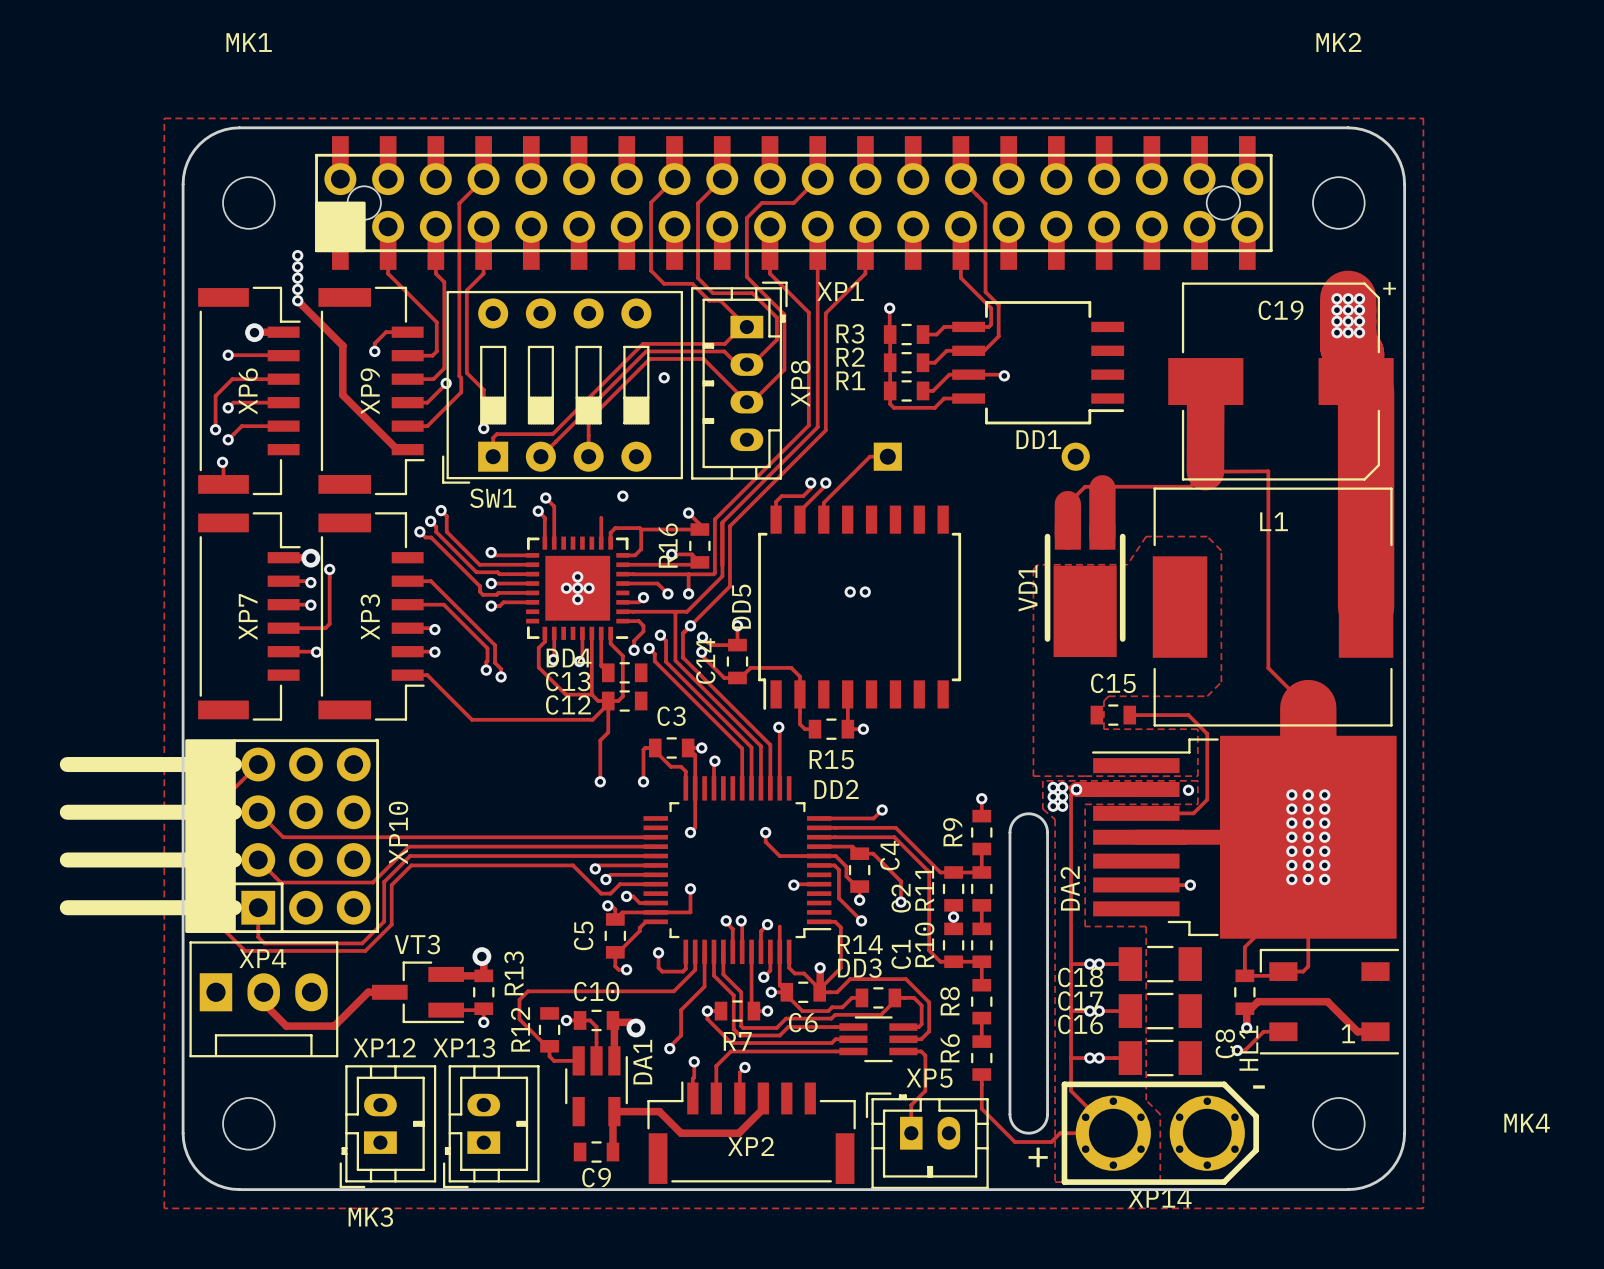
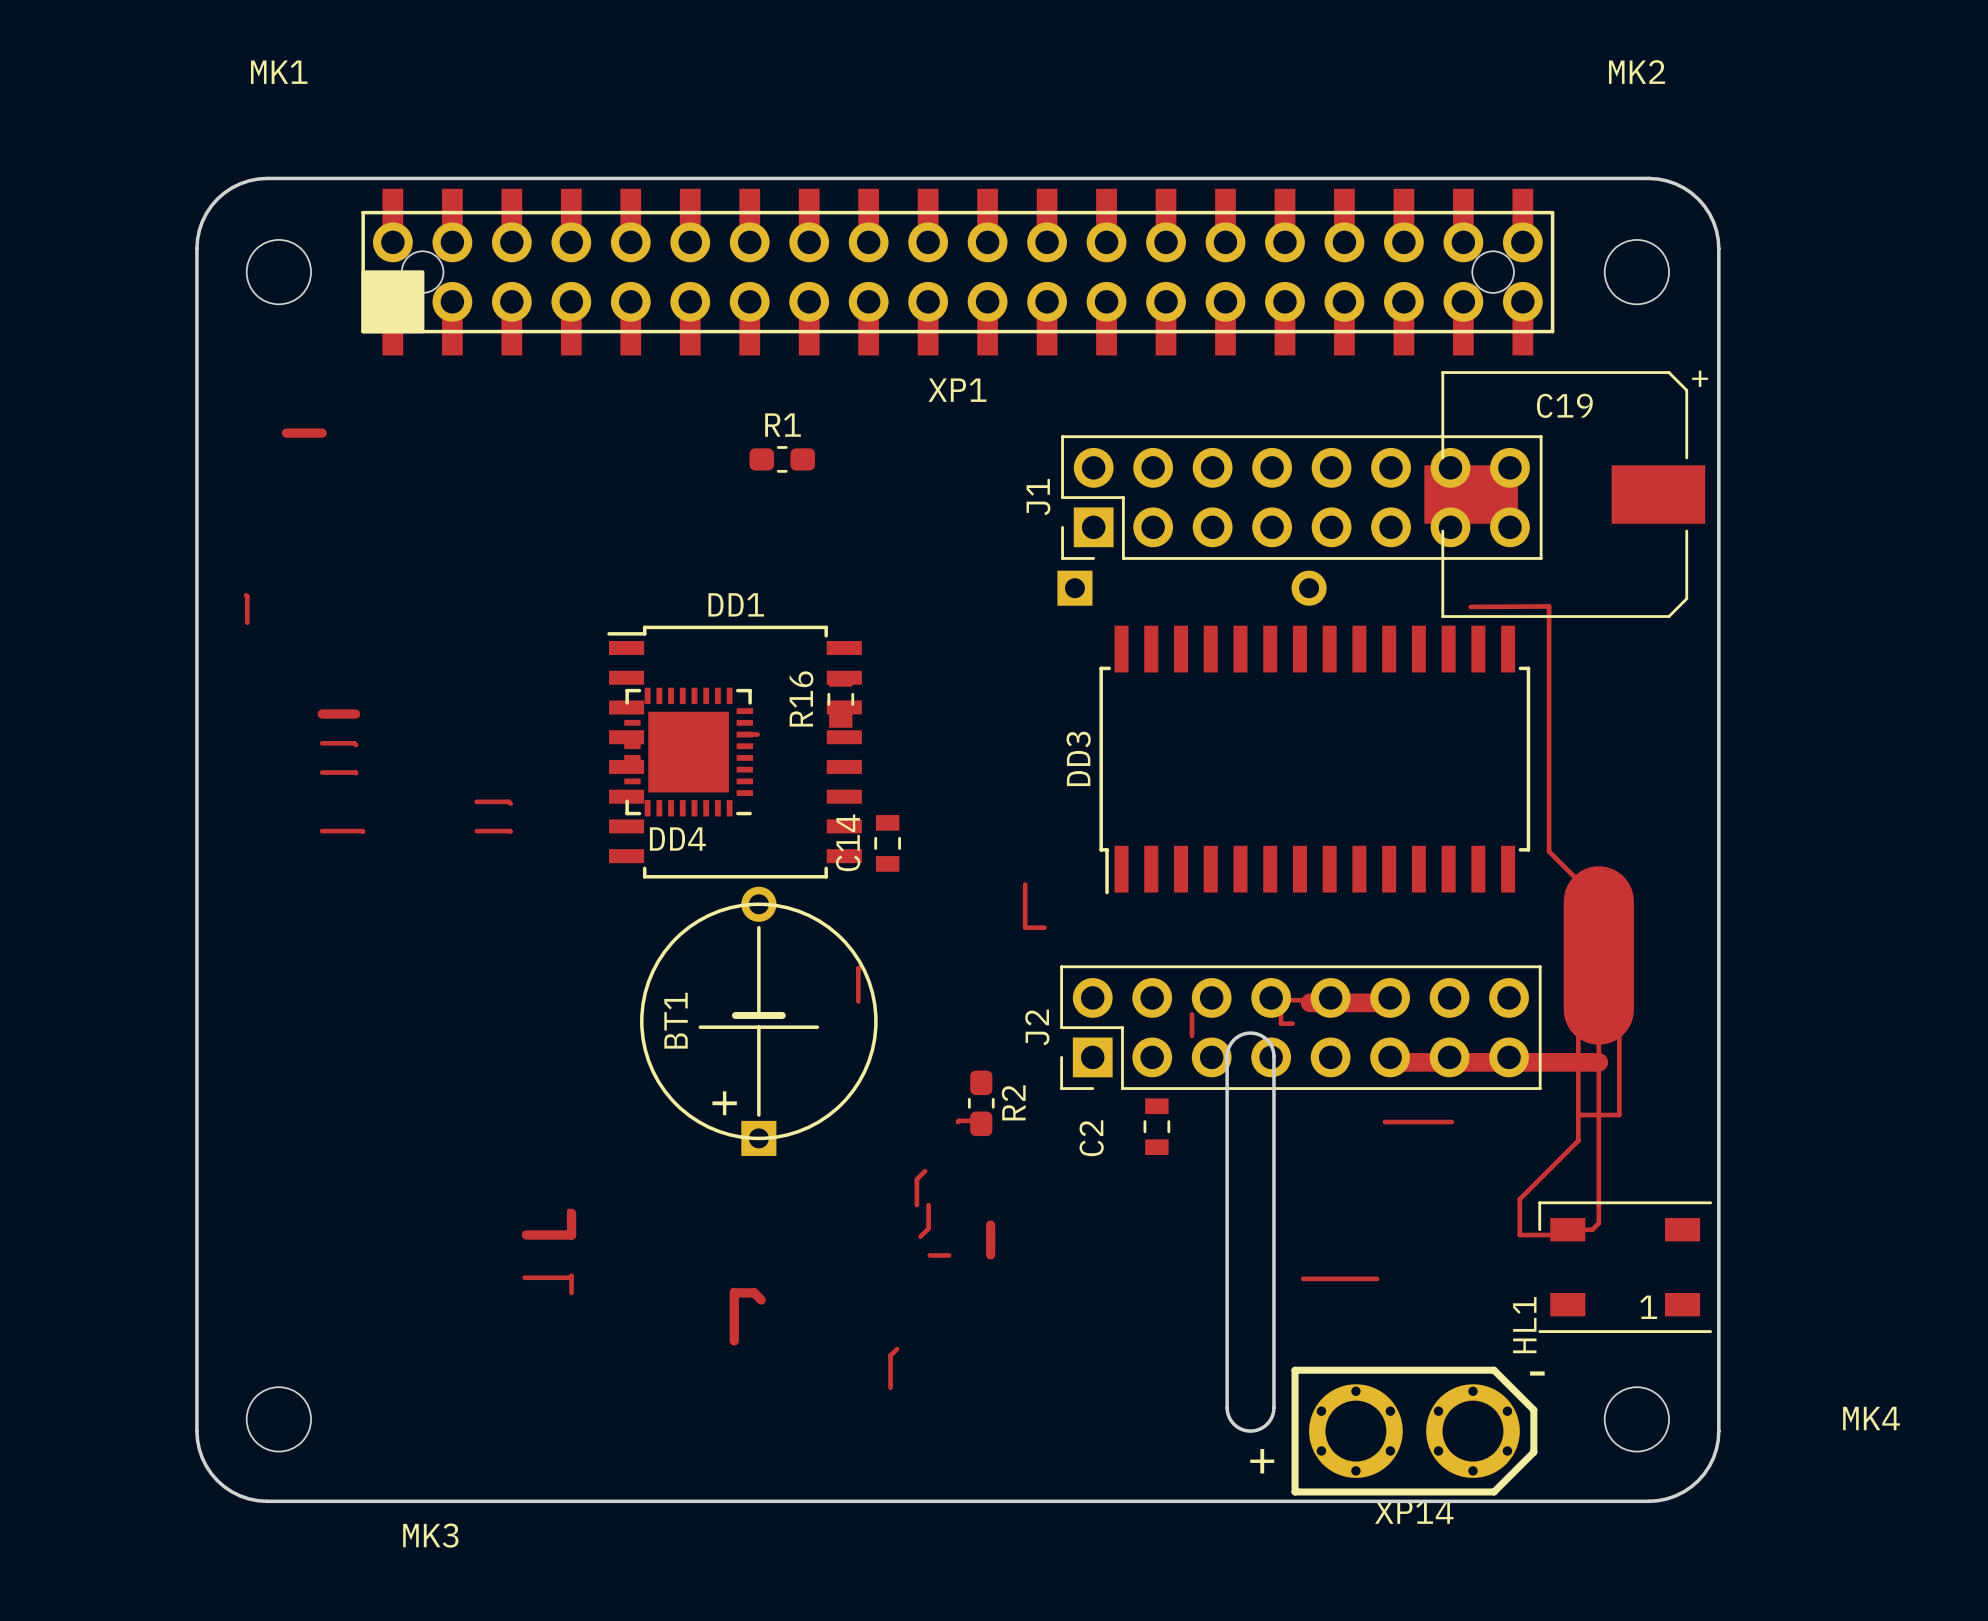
zone outline: (164, 118) (1423, 118) (1423, 1208) (164, 1208) (164, 118) -> none
track: (483, 151) (483, 179) (459, 203) (459, 376) (461, 377) (461, 392) (427, 426) (407, 426) -> none
track: (960, 151) (960, 179) (985, 203) (985, 291) (998, 305) (998, 336) (984, 350) (946, 350) (934, 362) (923, 362) -> none
track: (674, 179) (651, 202) (651, 270) (664, 283) (692, 283) (709, 300) (720, 300) (746, 327) (741, 327) (724, 343) (642, 343) (552, 434) (496, 434) (493, 437) (493, 456) -> none
track: (722, 179) (698, 203) (698, 278) (713, 293) (752, 293) (776, 317) (776, 339) (752, 364) (737, 364) (724, 351) (646, 351) (540, 456) -> none
track: (817, 179) (793, 202) (761, 202) (746, 217) (746, 276) (784, 314) (784, 369) (752, 402) (746, 402) (703, 358) (649, 358) (588, 420) (588, 456) -> none
track: (388, 226) (388, 273) (436, 322) (436, 351) (432, 355) (407, 355) -> none
track: (435, 226) (435, 273) (444, 282) (444, 368) (433, 379) (407, 379) -> none
track: (960, 226) (960, 277) (991, 308) (991, 324) (988, 326) (944, 326) (936, 334) (923, 334) -> none
track: (483, 254) (483, 273) (466, 290) (466, 373) (483, 389) (483, 428) -> none
track: (769, 254) (769, 273) (808, 312) (808, 425) (714, 519) (713, 574) (633, 574) -> none
track: (817, 254) (817, 427) (722, 522) (722, 576) (687, 611) (622, 611) -> none
track: (865, 254) (865, 273) (825, 313) (825, 430) (729, 526) (729, 586) (682, 633) (682, 657) (770, 744) (770, 788) -> none
via: (297, 255) -> none
via: (297, 266) -> none
via: (297, 278) -> none
via: (297, 289) -> none
XP1 name position: XP1 (840, 291) -> XP1 (957, 390)
via: (1336, 298) -> none
track: (1348, 298) (1348, 346) (1356, 354) (1356, 381) (1366, 391) (1366, 607) -> none
via: (1348, 298) -> none
via: (1359, 298) -> none
track: (297, 300) (342, 345) (342, 395) (397, 449) (407, 449) -> none
via: (297, 300) -> none
DD1 footprint: [952, 301, 1125, 425] -> [607, 625, 862, 879]
track: (889, 308) (890, 404) (893, 407) (934, 407) (944, 398) (968, 398) -> none
via: (889, 308) -> none
via: (1336, 310) -> none
via: (1348, 310) -> none
via: (1359, 310) -> none
via: (1336, 321) -> none
via: (1348, 321) -> none
via: (1359, 321) -> none
via: (254, 332) -> none
track: (407, 332) (386, 332) (374, 343) (374, 351) -> none
via: (1336, 332) -> none
via: (1348, 332) -> none
via: (1359, 332) -> none
R3: (906, 334) -> none
via: (374, 351) -> none
R2 footprint: [883, 352, 930, 374] -> [967, 1070, 995, 1137]
track: (228, 355) (283, 355) -> none
via: (228, 355) -> none
R2 name position: R2 (850, 357) -> R2 (1013, 1102)
track: (1004, 375) (949, 374) (933, 390) (923, 390) -> none
via: (1004, 375) -> none
via: (664, 377) -> none
track: (283, 379) (232, 379) (215, 396) (215, 429) -> none
XP8: (739, 380) -> none
R1 name position: R1 (850, 380) -> R1 (782, 425)
R1 footprint: [883, 380, 930, 402] -> [749, 446, 816, 473]
track: (1205, 381) (1205, 471) (1190, 486) (1085, 486) (1067, 504) (1067, 536) -> none
track: (446, 383) (427, 402) (407, 402) -> none
via: (446, 383) -> none
J1: none -> (1301, 497)
SW1: (562, 387) -> none
XP6: (249, 390) -> none
XP9: (371, 390) -> none
track: (283, 402) (233, 402) (228, 407) -> none
via: (228, 407) -> none
track: (283, 426) (241, 426) (228, 439) -> none
via: (483, 428) -> none
via: (215, 429) -> none
via: (228, 439) -> none
DD1 name position: DD1 (1038, 439) -> DD1 (736, 604)
track: (887, 456) (869, 456) (823, 502) (823, 519) -> none
via: (222, 462) -> none
track: (810, 483) (810, 488) (803, 496) (781, 496) (776, 501) (776, 519) -> none
via: (810, 483) -> none
track: (825, 483) (825, 485) (799, 511) (799, 519) -> none
via: (825, 483) -> none
track: (1103, 486) (1102, 536) -> none
via: (622, 496) -> none
track: (545, 498) (554, 506) (554, 543) -> none
via: (545, 498) -> none
track: (441, 510) (446, 516) (446, 531) (479, 564) (532, 564) -> none
via: (441, 510) -> none
track: (538, 511) (544, 517) (544, 543) -> none
via: (538, 511) -> none
track: (688, 513) (699, 524) (699, 529) (641, 529) -> none
via: (688, 513) -> none
track: (601, 517) (601, 543) -> none
track: (430, 521) (436, 527) (436, 531) (476, 572) (532, 574) -> none
via: (430, 521) -> none
track: (641, 529) (615, 528) (610, 532) (610, 543) -> none
track: (641, 529) (641, 549) (635, 555) (622, 555) -> none
track: (419, 531) (425, 537) (431, 537) (480, 586) (480, 591) (483, 594) (532, 592) -> none
via: (419, 531) -> none
zone outline: (1146, 536) (1207, 536) (1221, 550) (1221, 682) (1207, 696) (1108, 696) (1103, 701) (1103, 729) (1197, 729) (1197, 776) (1033, 776) (1033, 569) (1038, 564) (1127, 564) (1146, 536) -> none
track: (491, 552) (493, 555) (532, 555) -> none
via: (491, 552) -> none
track: (671, 554) (691, 554) (699, 562) (697, 564) (622, 564) -> none
via: (671, 554) -> none
via: (310, 558) -> none
track: (329, 569) (329, 623) (325, 628) (283, 628) -> none
via: (329, 569) -> none
track: (688, 574) (688, 593) -> none
via: (577, 576) -> none
track: (407, 581) (430, 581) (495, 645) (495, 662) (501, 668) (501, 676) -> none
via: (310, 582) -> none
track: (491, 583) (532, 583) -> none
via: (491, 583) -> none
track: (622, 583) (657, 583) (667, 593) -> none
via: (566, 588) -> none
via: (577, 588) -> none
via: (589, 588) -> none
VD1: (1085, 590) -> none
via: (850, 592) -> none
via: (865, 592) -> none
via: (667, 593) -> none
via: (688, 593) -> none
track: (643, 597) (638, 602) (622, 602) -> none
via: (643, 597) -> none
via: (577, 599) -> none
track: (532, 602) (503, 602) (499, 606) (491, 606) -> none
track: (407, 604) (443, 604) (487, 648) (486, 670) -> none
via: (310, 605) -> none
via: (491, 606) -> none
DD5: (859, 607) -> none
L1: (1273, 607) -> none
track: (675, 611) (675, 660) (760, 746) (760, 788) -> none
XP7: (249, 616) -> none
XP3: (371, 616) -> none
track: (622, 621) (638, 621) (643, 625) (643, 631) (634, 640) (634, 650) -> none
via: (690, 625) -> none
track: (737, 625) (737, 645) (711, 645) (702, 637) -> none
via: (737, 625) -> none
via: (434, 629) -> none
track: (544, 633) (544, 641) (538, 647) (538, 667) (565, 694) (591, 694) -> none
track: (554, 633) (553, 659) -> none
track: (582, 633) (582, 658) (579, 661) -> none
track: (591, 633) (591, 694) -> none
track: (601, 633) (601, 665) (608, 672) -> none
track: (610, 633) (610, 643) (622, 655) (622, 696) (618, 701) (598, 701) (591, 694) -> none
track: (660, 635) (666, 640) (666, 661) (751, 747) (751, 788) -> none
via: (660, 635) -> none
via: (702, 637) -> none
track: (649, 648) (654, 654) (654, 661) (742, 748) (742, 788) -> none
via: (649, 648) -> none
via: (634, 650) -> none
via: (316, 652) -> none
via: (434, 652) -> none
track: (701, 652) (701, 655) (724, 677) (740, 677) (750, 667) (791, 667) (799, 676) (799, 724) (804, 729) (814, 729) -> none
via: (701, 652) -> none
via: (553, 659) -> none
via: (579, 661) -> none
via: (486, 670) -> none
C13: (624, 672) -> none
track: (407, 675) (427, 675) (472, 719) (592, 719) (608, 704) -> none
via: (501, 676) -> none
track: (608, 701) (608, 732) (600, 740) (600, 781) -> none
C12: (624, 701) -> none
C15: (1113, 715) -> none
track: (1129, 715) (1188, 715) (1207, 733) (1207, 799) (1193, 813) (1136, 813) -> none
track: (778, 727) (779, 788) -> none
via: (778, 727) -> none
R15: (831, 729) -> none
via: (863, 729) -> none
C3: (671, 747) -> none
track: (701, 747) (688, 747) (695, 755) (695, 827) (690, 832) -> none
via: (701, 747) -> none
via: (714, 761) -> none
track: (258, 764) (225, 797) (225, 931) (245, 950) (365, 950) (391, 924) (391, 885) (411, 865) (573, 865) (601, 893) (610, 893) (620, 884) (655, 884) -> none
zone outline: (1042, 780) (1197, 780) (1197, 804) (1085, 804) (1085, 926) (1146, 926) (1146, 1100) (1160, 1114) (1160, 1182) (1055, 1182) (1055, 819) (1042, 809) (1042, 780) -> none
via: (600, 781) -> none
track: (643, 781) (643, 749) (655, 747) (655, 751) (670, 766) (681, 766) (685, 771) (685, 788) -> none
via: (643, 781) -> none
via: (1053, 787) -> none
via: (1062, 787) -> none
track: (1076, 789) (1071, 794) (1071, 1090) (1113, 1133) (1060, 1133) (1051, 1141) (1014, 1141) (981, 1108) (981, 1074) -> none
via: (1076, 789) -> none
via: (1188, 790) -> none
via: (1291, 794) -> none
via: (1308, 794) -> none
via: (1324, 794) -> none
via: (1053, 796) -> none
via: (1062, 796) -> none
via: (981, 798) -> none
BT1: none -> (758, 1021)
via: (1053, 806) -> none
via: (1062, 806) -> none
track: (882, 809) (873, 818) (819, 818) -> none
via: (882, 809) -> none
J2: none -> (1300, 1027)
via: (1291, 809) -> none
via: (1308, 809) -> none
via: (1324, 809) -> none
track: (258, 812) (283, 837) (655, 837) -> none
via: (1291, 823) -> none
via: (1308, 823) -> none
via: (1324, 823) -> none
track: (819, 827) (895, 827) (940, 872) (981, 872) (981, 848) -> none
via: (690, 832) -> none
track: (765, 832) (765, 841) (779, 856) (835, 856) (846, 866) (846, 876) (856, 886) (859, 886) (859, 900) -> none
via: (765, 832) -> none
R9: (981, 832) -> none
XP10: (219, 836) -> none
track: (819, 837) (894, 837) (929, 872) (929, 950) (940, 961) (981, 961) (981, 985) -> none
DA2: (1244, 837) -> none
via: (1291, 837) -> none
via: (1308, 837) -> none
via: (1324, 837) -> none
track: (655, 846) (408, 846) (373, 882) (280, 882) (258, 859) -> none
track: (819, 846) (852, 846) (859, 853) (873, 853) (900, 881) (900, 902) -> none
via: (1291, 851) -> none
via: (1308, 851) -> none
via: (1324, 851) -> none
track: (655, 856) (410, 856) (384, 881) (384, 921) (362, 943) (264, 943) (258, 937) (258, 907) -> none
track: (655, 865) (598, 865) (595, 868) -> none
track: (819, 865) (834, 865) (838, 869) (838, 898) (861, 920) -> none
via: (1291, 865) -> none
via: (1308, 865) -> none
via: (1324, 865) -> none
via: (595, 868) -> none
DD2: (737, 870) -> none
C4: (859, 870) -> none
track: (655, 874) (610, 874) (605, 879) -> none
via: (605, 879) -> none
via: (1291, 879) -> none
via: (1308, 879) -> none
via: (1324, 879) -> none
via: (793, 885) -> none
via: (1190, 885) -> none
track: (690, 888) (690, 912) (622, 912) (615, 919) (615, 909) (611, 905) (607, 905) -> none
via: (690, 888) -> none
R11: (981, 888) -> none
track: (626, 896) (633, 896) (639, 903) (655, 903) -> none
via: (626, 896) -> none
via: (859, 900) -> none
via: (900, 902) -> none
via: (607, 905) -> none
track: (981, 905) (981, 928) -> none
via: (953, 917) -> none
track: (726, 920) (732, 929) (732, 951) -> none
via: (726, 920) -> none
track: (741, 920) (742, 951) -> none
via: (741, 920) -> none
via: (861, 920) -> none
track: (655, 921) (645, 921) (639, 927) (639, 931) (618, 952) (615, 952) (615, 966) (618, 969) (626, 969) -> none
track: (819, 921) (835, 921) (840, 927) (840, 968) (819, 989) -> none
via: (767, 924) -> none
track: (779, 926) (779, 985) (802, 1011) (828, 1011) (832, 1007) (842, 1007) (851, 997) (861, 997) -> none
C5: (615, 935) -> none
C1: (953, 945) -> none
R10: (981, 945) -> none
track: (685, 951) (685, 968) (682, 971) (662, 971) (658, 967) (658, 952) -> none
track: (695, 951) (695, 970) (673, 991) (527, 991) (519, 999) (519, 1019) (546, 1046) (549, 1046) (549, 1056) (554, 1060) (578, 1060) -> none
track: (704, 951) (704, 986) (681, 1010) (681, 1035) (669, 1048) -> none
track: (713, 951) (713, 975) (733, 995) (733, 1029) (739, 1035) (779, 1035) (788, 1027) (853, 1027) -> none
track: (723, 951) (723, 974) (741, 992) (741, 1026) (743, 1027) (776, 1027) (786, 1018) (831, 1018) (835, 1014) (881, 1014) (894, 1001) (894, 997) (914, 997) (921, 1005) (921, 1024) (918, 1027) (903, 1027) -> none
track: (751, 951) (751, 1008) (753, 1011) (767, 1011) -> none
track: (789, 951) (789, 967) (794, 973) (804, 973) (819, 989) -> none
via: (658, 952) -> none
via: (481, 956) -> none
track: (1071, 964) (1130, 964) -> none
via: (1089, 964) -> none
via: (1099, 964) -> none
C18: (1160, 964) -> none
via: (820, 967) -> none
DD3 name position: DD3 (859, 968) -> DD3 (1078, 758)
via: (626, 969) -> none
via: (763, 977) -> none
track: (819, 989) (819, 992) (837, 992) (850, 979) (905, 979) (929, 1002) (929, 1031) (921, 1039) (903, 1039) -> none
track: (263, 992) (263, 1003) (286, 1026) (334, 1026) (368, 992) (389, 992) -> none
VT3: (418, 992) -> none
R13: (483, 992) -> none
via: (771, 992) -> none
C6: (803, 992) -> none
C8: (1244, 992) -> none
R14: (878, 997) -> none
XP4: (263, 999) -> none
R8: (981, 1001) -> none
via: (707, 1011) -> none
track: (721, 1011) (707, 1011) (707, 1019) (731, 1043) (831, 1043) (835, 1039) (853, 1039) -> none
R7: (737, 1011) -> none
via: (767, 1011) -> none
via: (1089, 1011) -> none
via: (1099, 1011) -> none
C17: (1160, 1011) -> none
DD3 footprint: [839, 1016, 918, 1063] -> [1099, 625, 1531, 895]
track: (981, 1018) (981, 1041) -> none
track: (566, 1020) (590, 1020) (596, 1026) (596, 1060) -> none
via: (566, 1020) -> none
C10: (596, 1020) -> none
via: (483, 1022) -> none
via: (635, 1027) -> none
track: (1246, 1027) (1246, 1010) (1244, 1008) (1250, 1008) (1258, 1001) (1327, 1001) (1357, 1031) (1375, 1031) -> none
via: (1246, 1027) -> none
R12: (549, 1029) -> none
track: (1283, 1031) (1263, 1031) (1244, 1050) (1237, 1050) -> none
via: (669, 1048) -> none
via: (1237, 1050) -> none
track: (853, 1051) (730, 1051) (716, 1066) (716, 1098) -> none
track: (903, 1051) (921, 1051) (925, 1055) (925, 1090) (911, 1105) (911, 1133) -> none
R6: (981, 1058) -> none
track: (1071, 1058) (1130, 1058) -> none
via: (1089, 1058) -> none
via: (1099, 1058) -> none
C16: (1160, 1058) -> none
track: (694, 1061) (692, 1098) -> none
via: (694, 1061) -> none
via: (744, 1067) -> none
DA1: (596, 1086) -> none
track: (763, 1098) (763, 1108) (738, 1133) (681, 1133) (659, 1111) (614, 1111) (612, 1152) -> none
XP12: (387, 1126) -> none
XP13: (491, 1126) -> none
XP2: (751, 1132) -> none
XP5: (927, 1140) -> none
C9: (596, 1152) -> none

